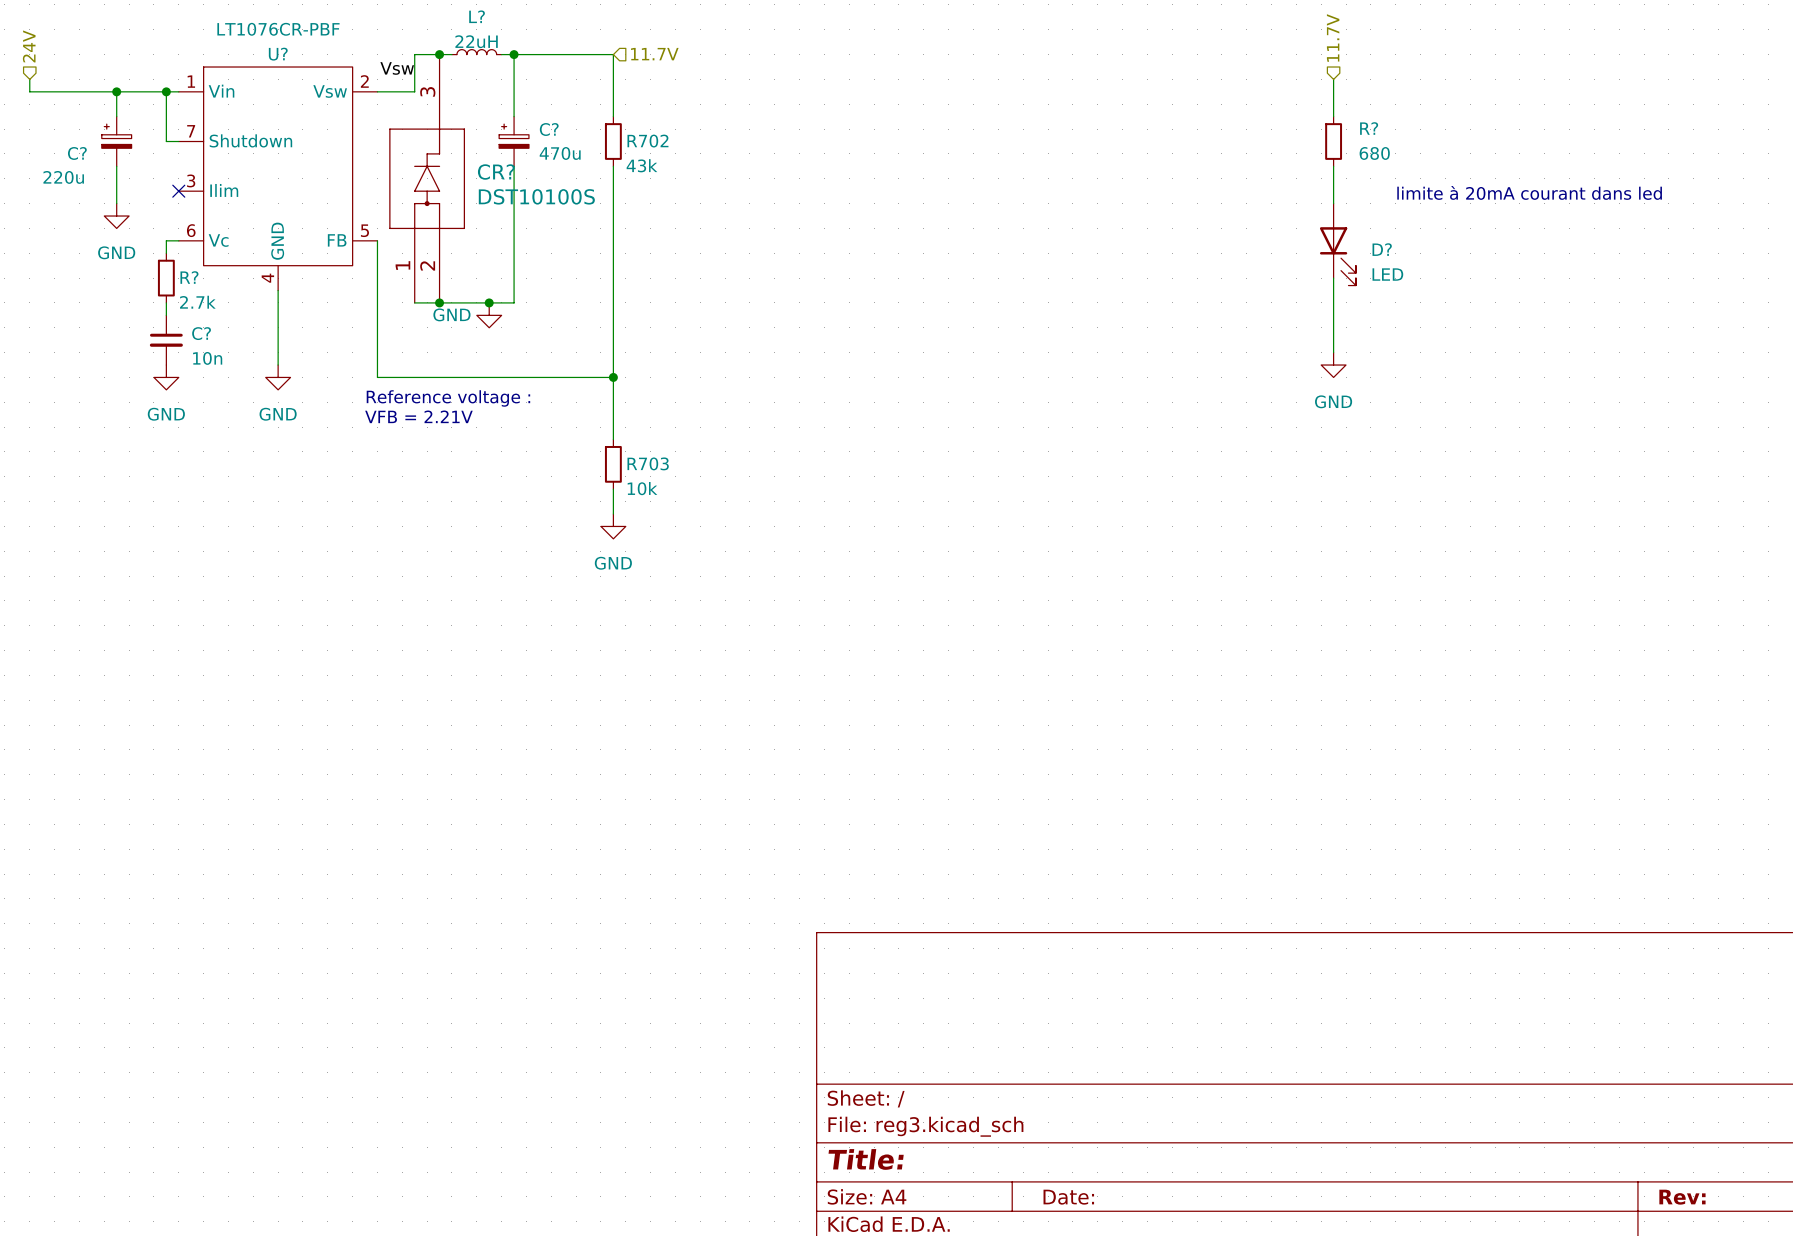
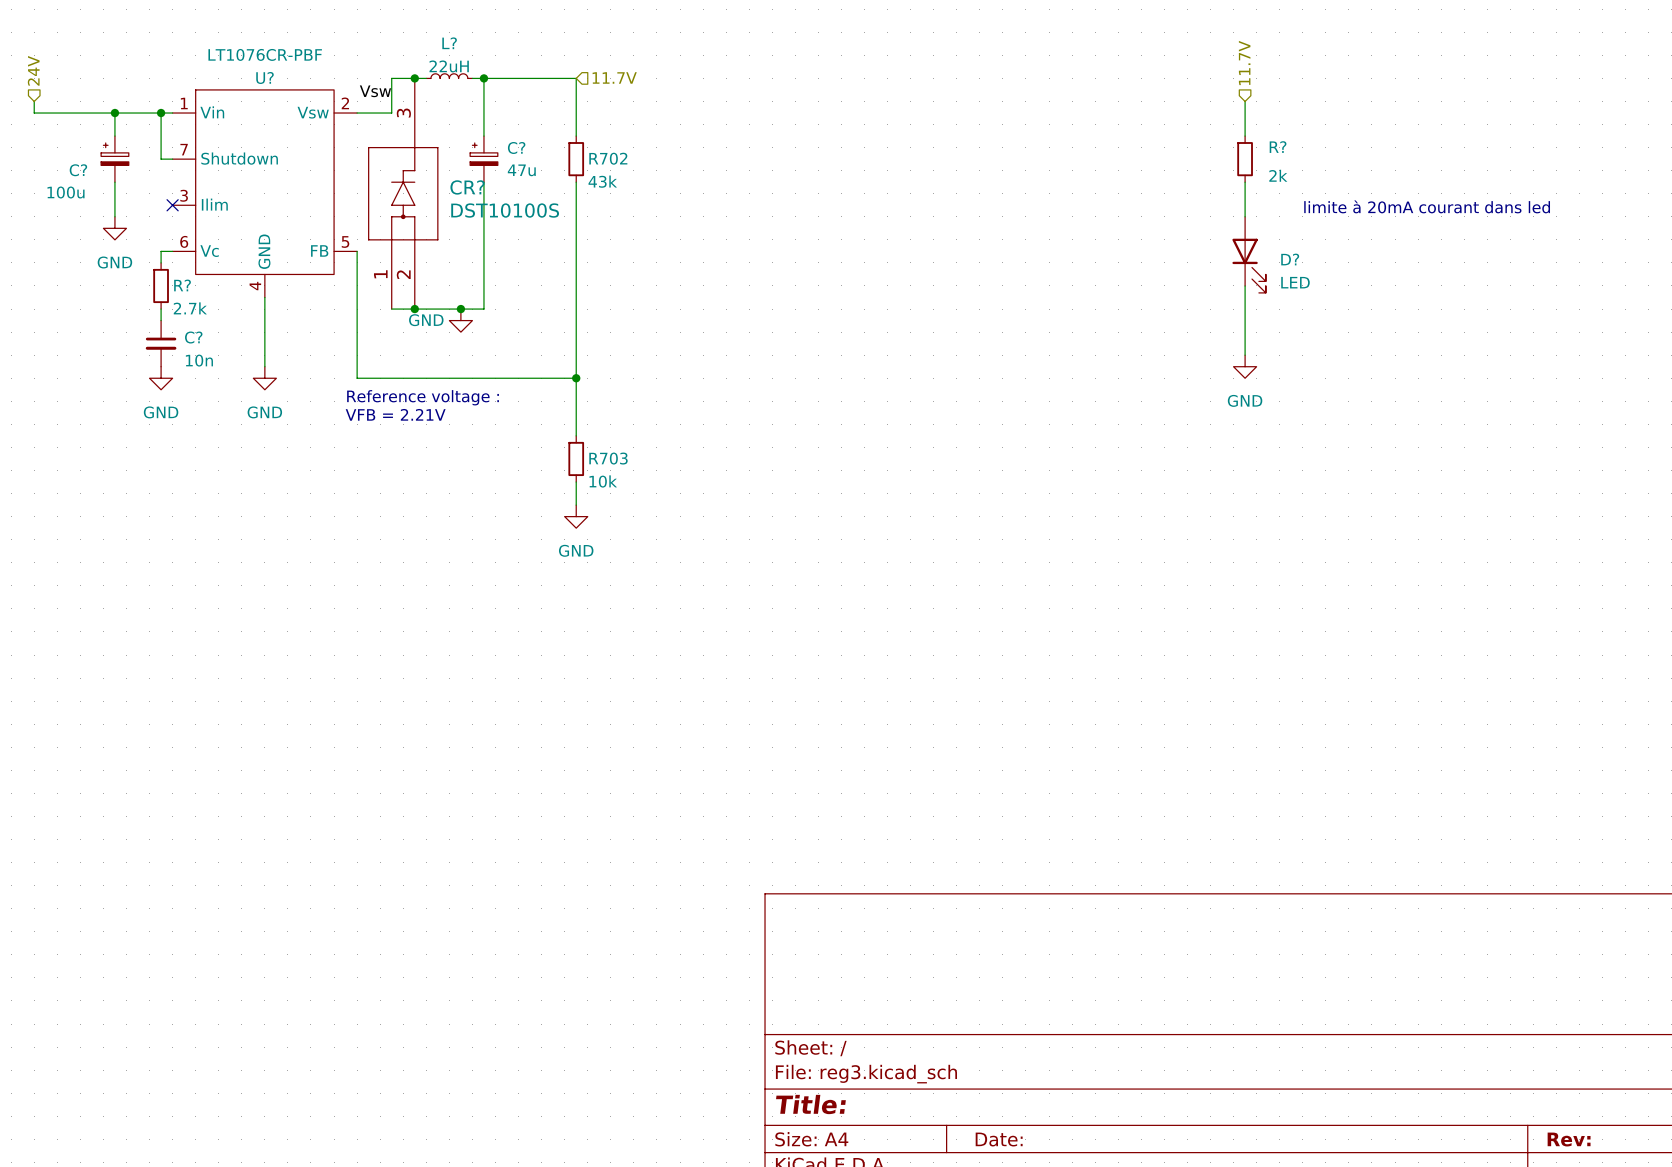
C? value: 470u (560, 153) -> 47u (521, 170)
R? value: 680 (1374, 153) -> 2k (1278, 175)
C? value: 220u (63, 177) -> 100u (66, 192)

